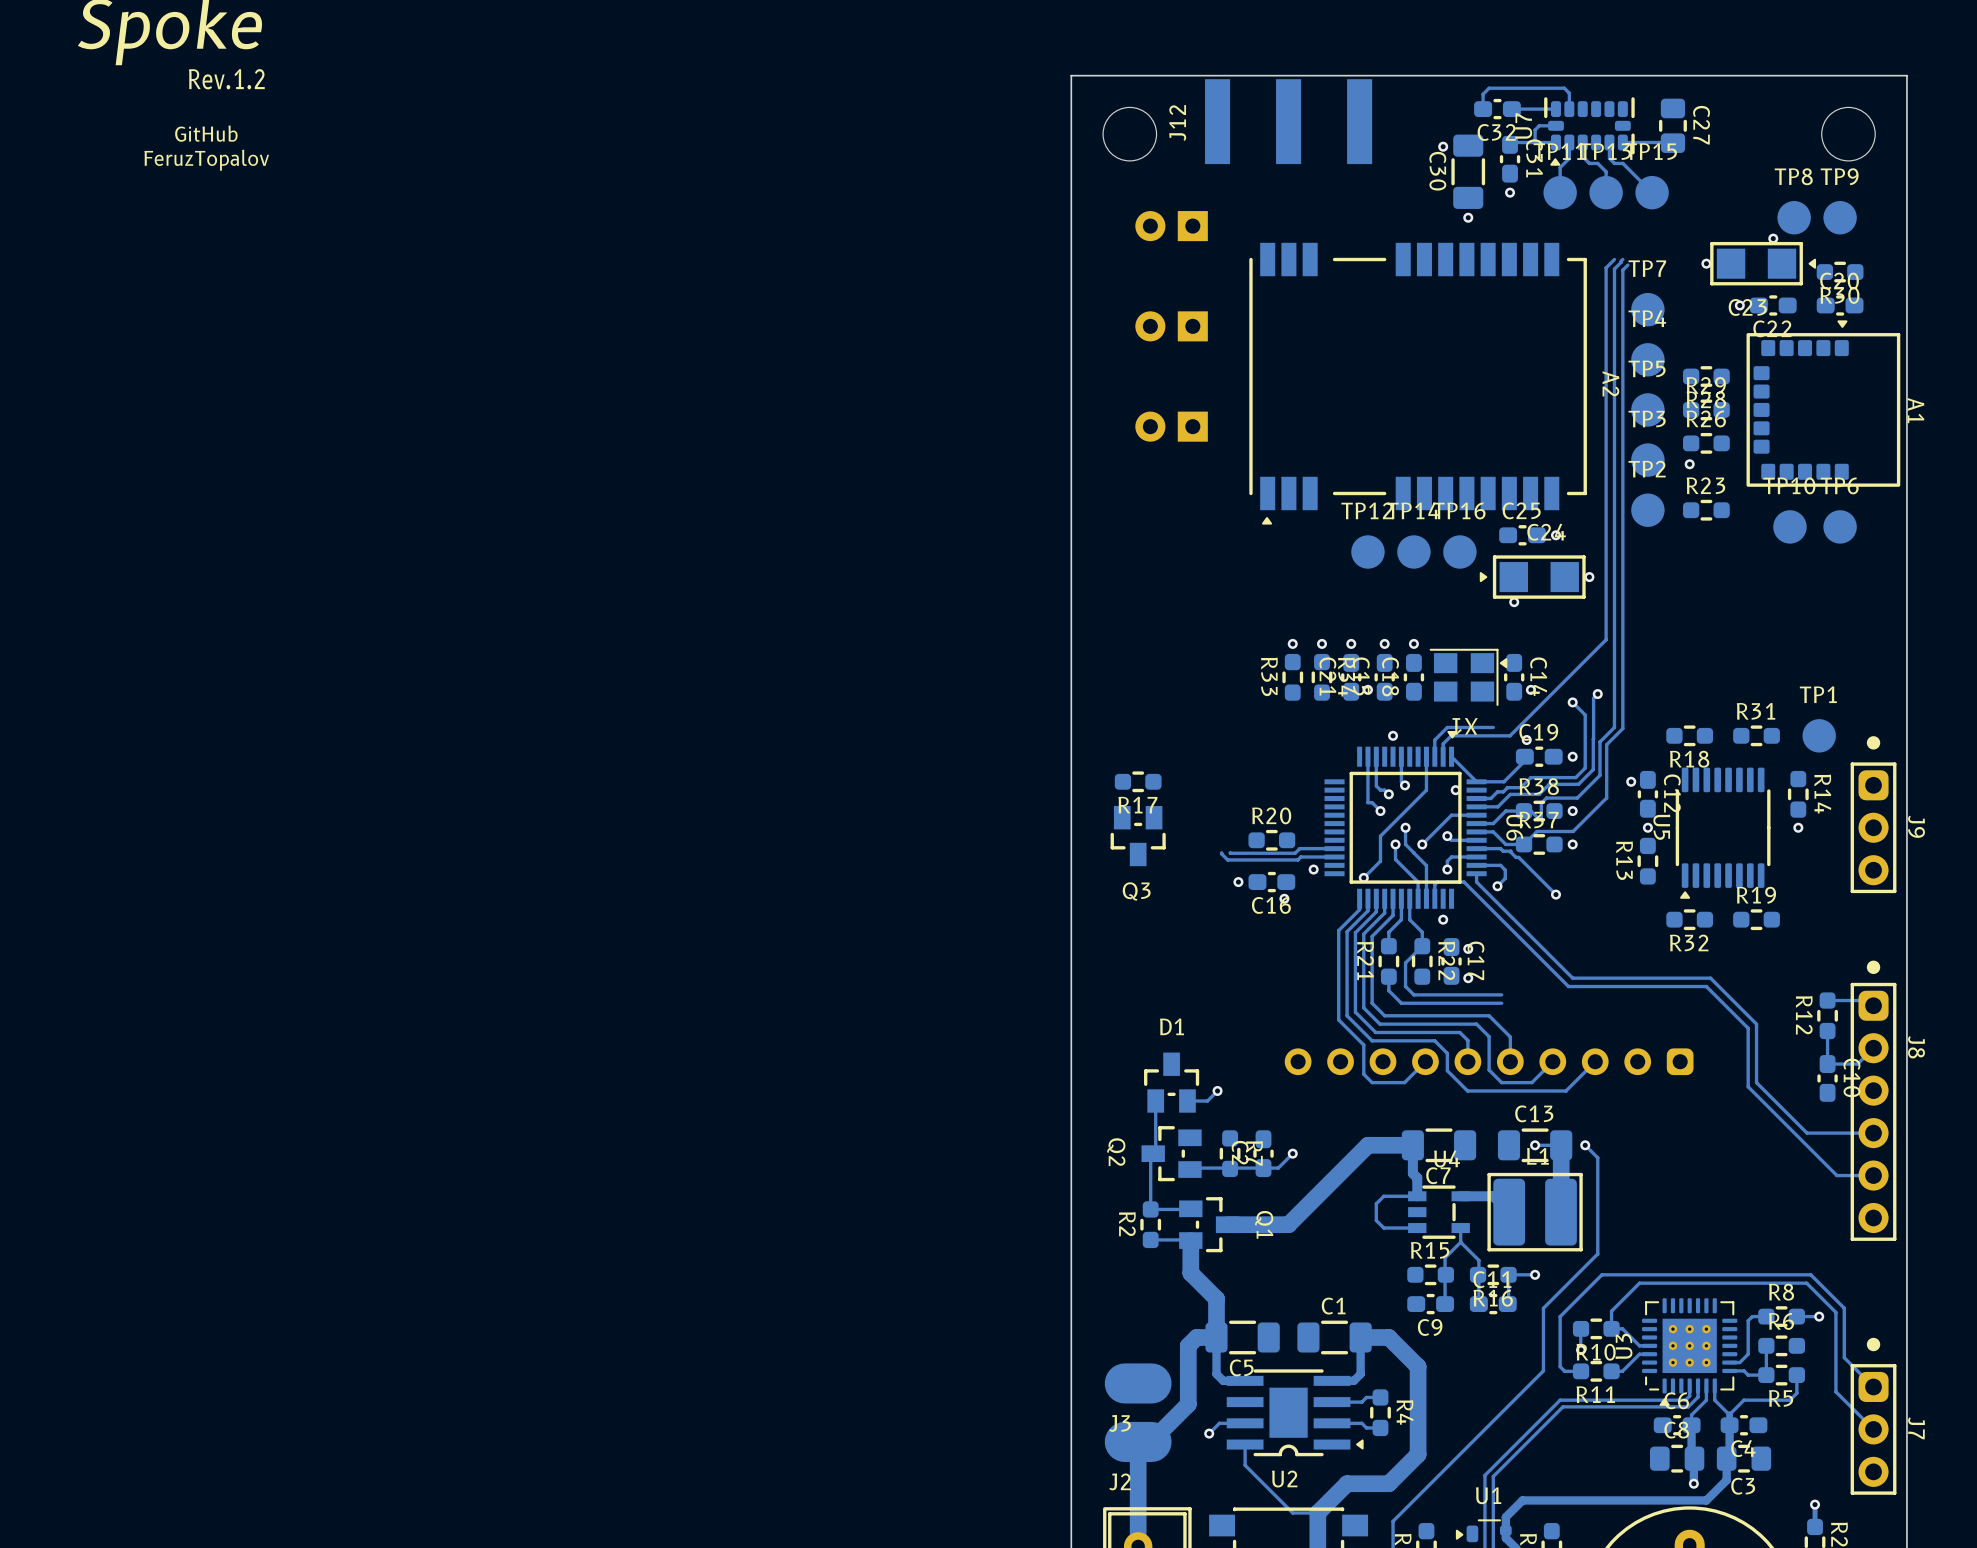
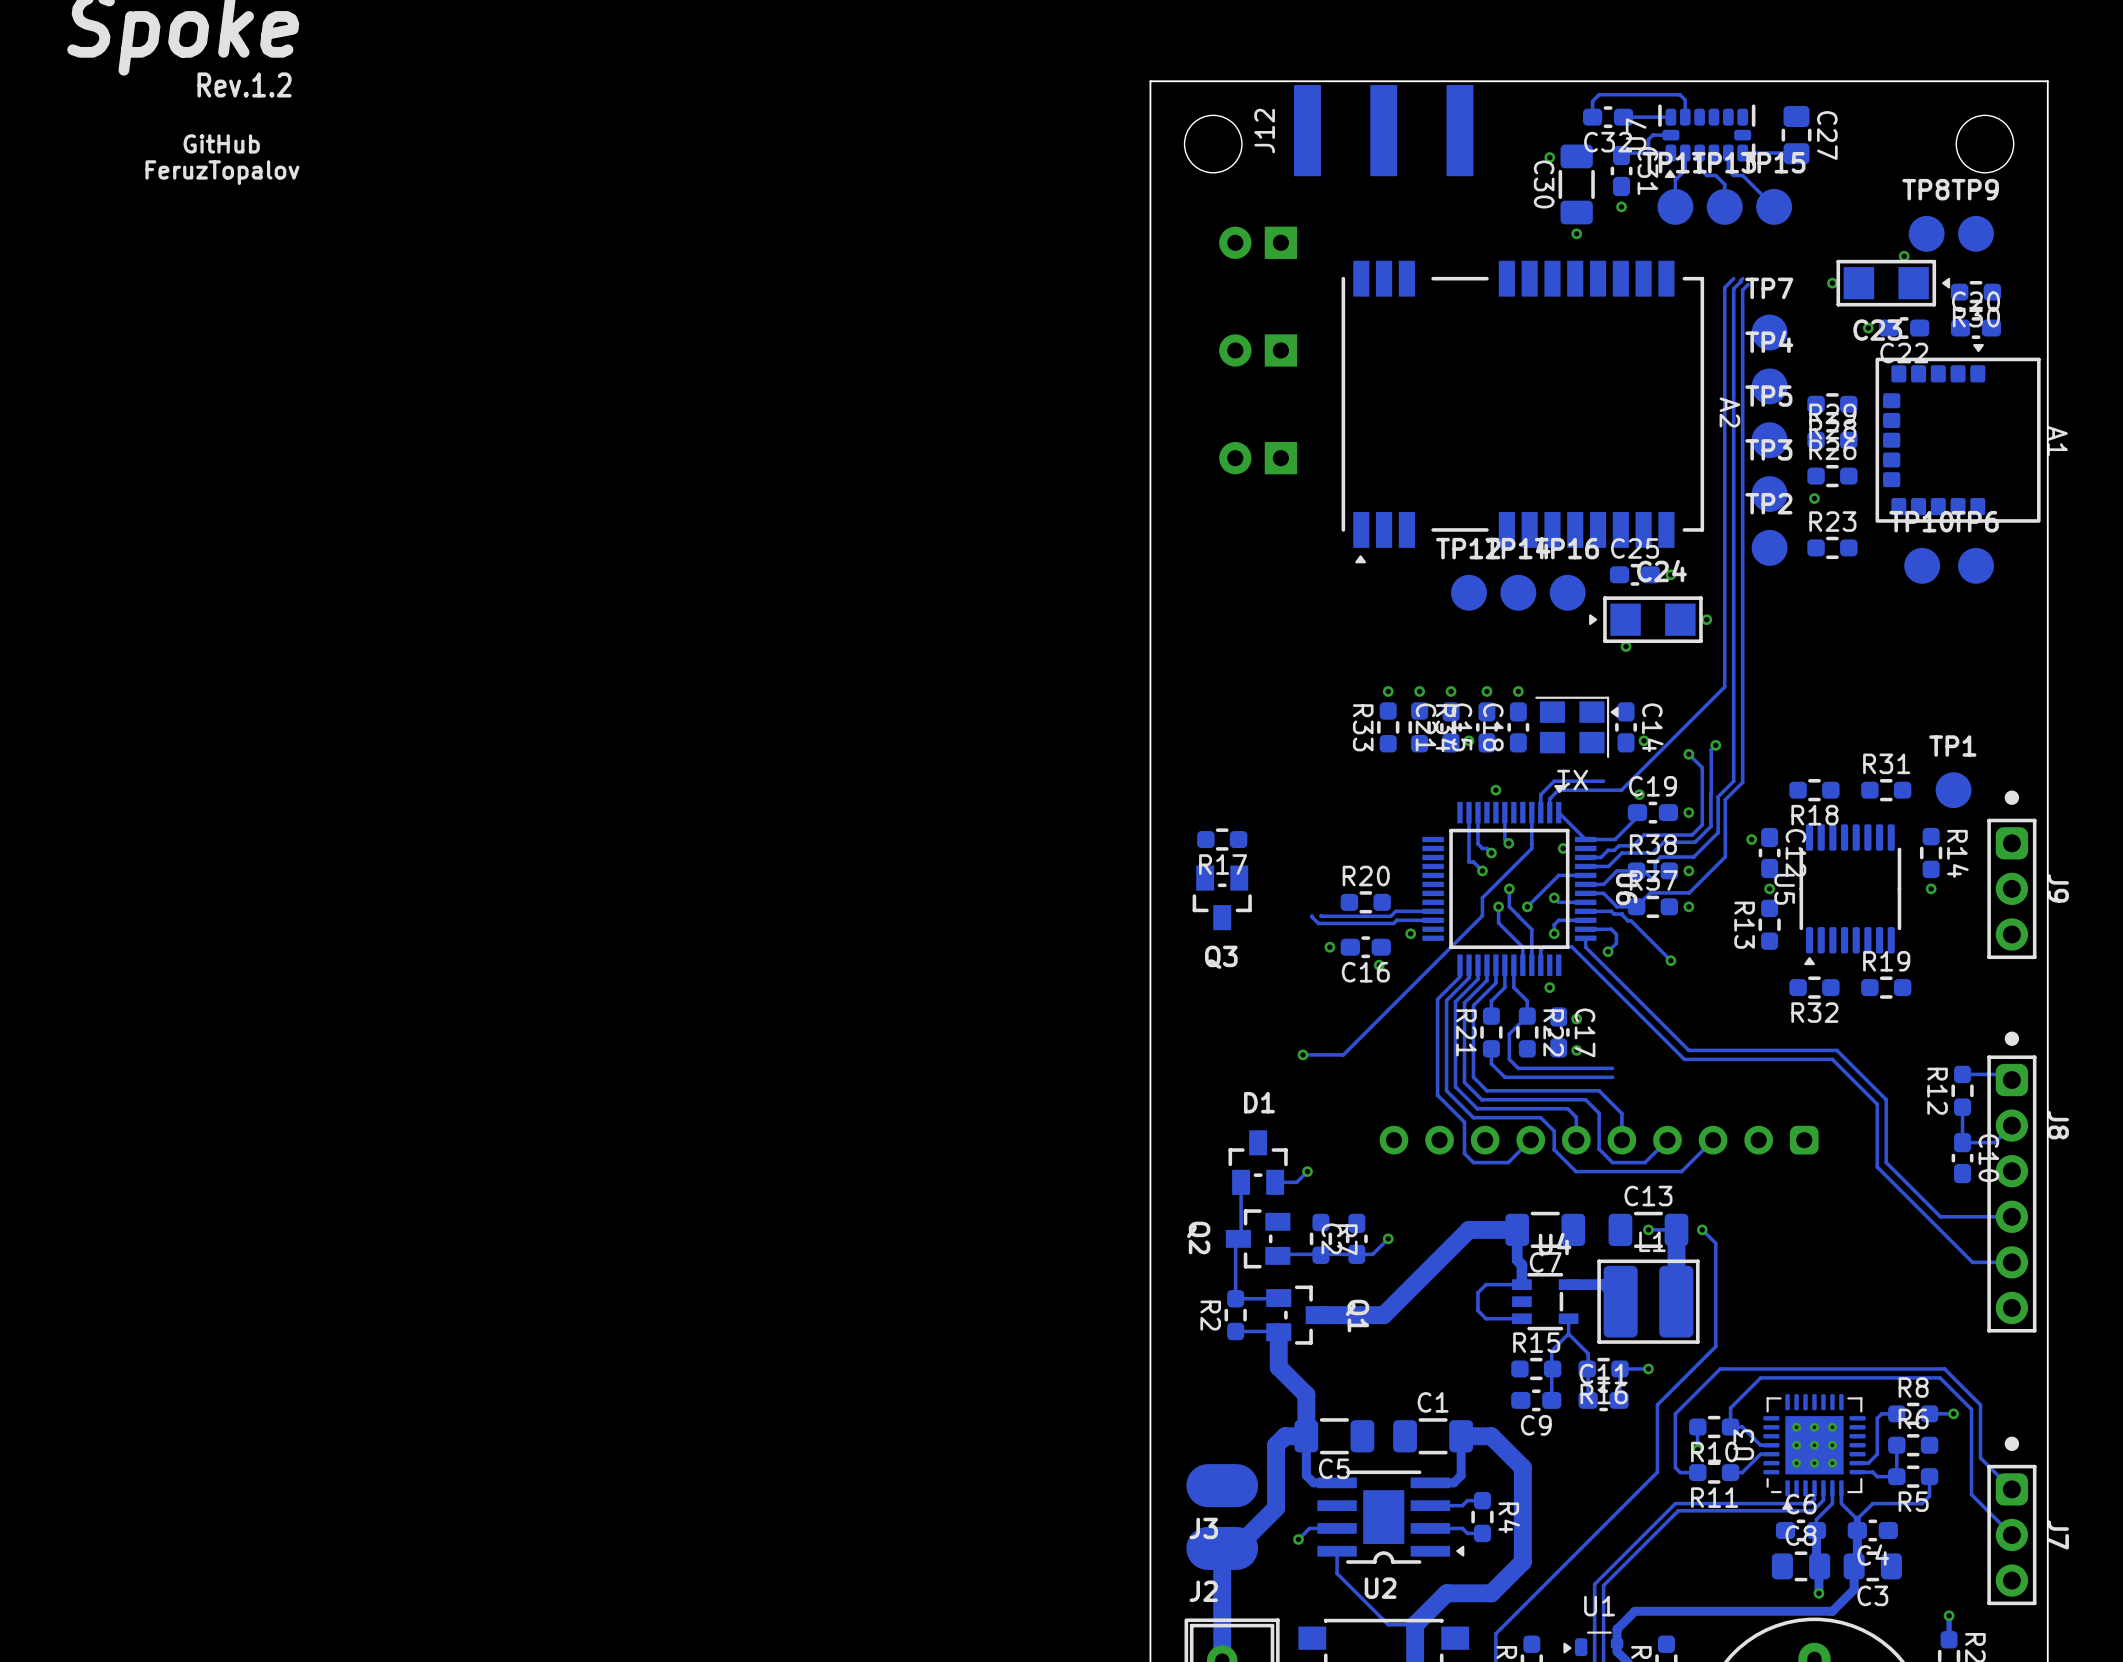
track: (1380, 852) (1380, 861) (1363, 877) -> (1482, 915) (1343, 1054) (1302, 1054)
via: (1363, 877) -> none
via: none -> (1302, 1054)

